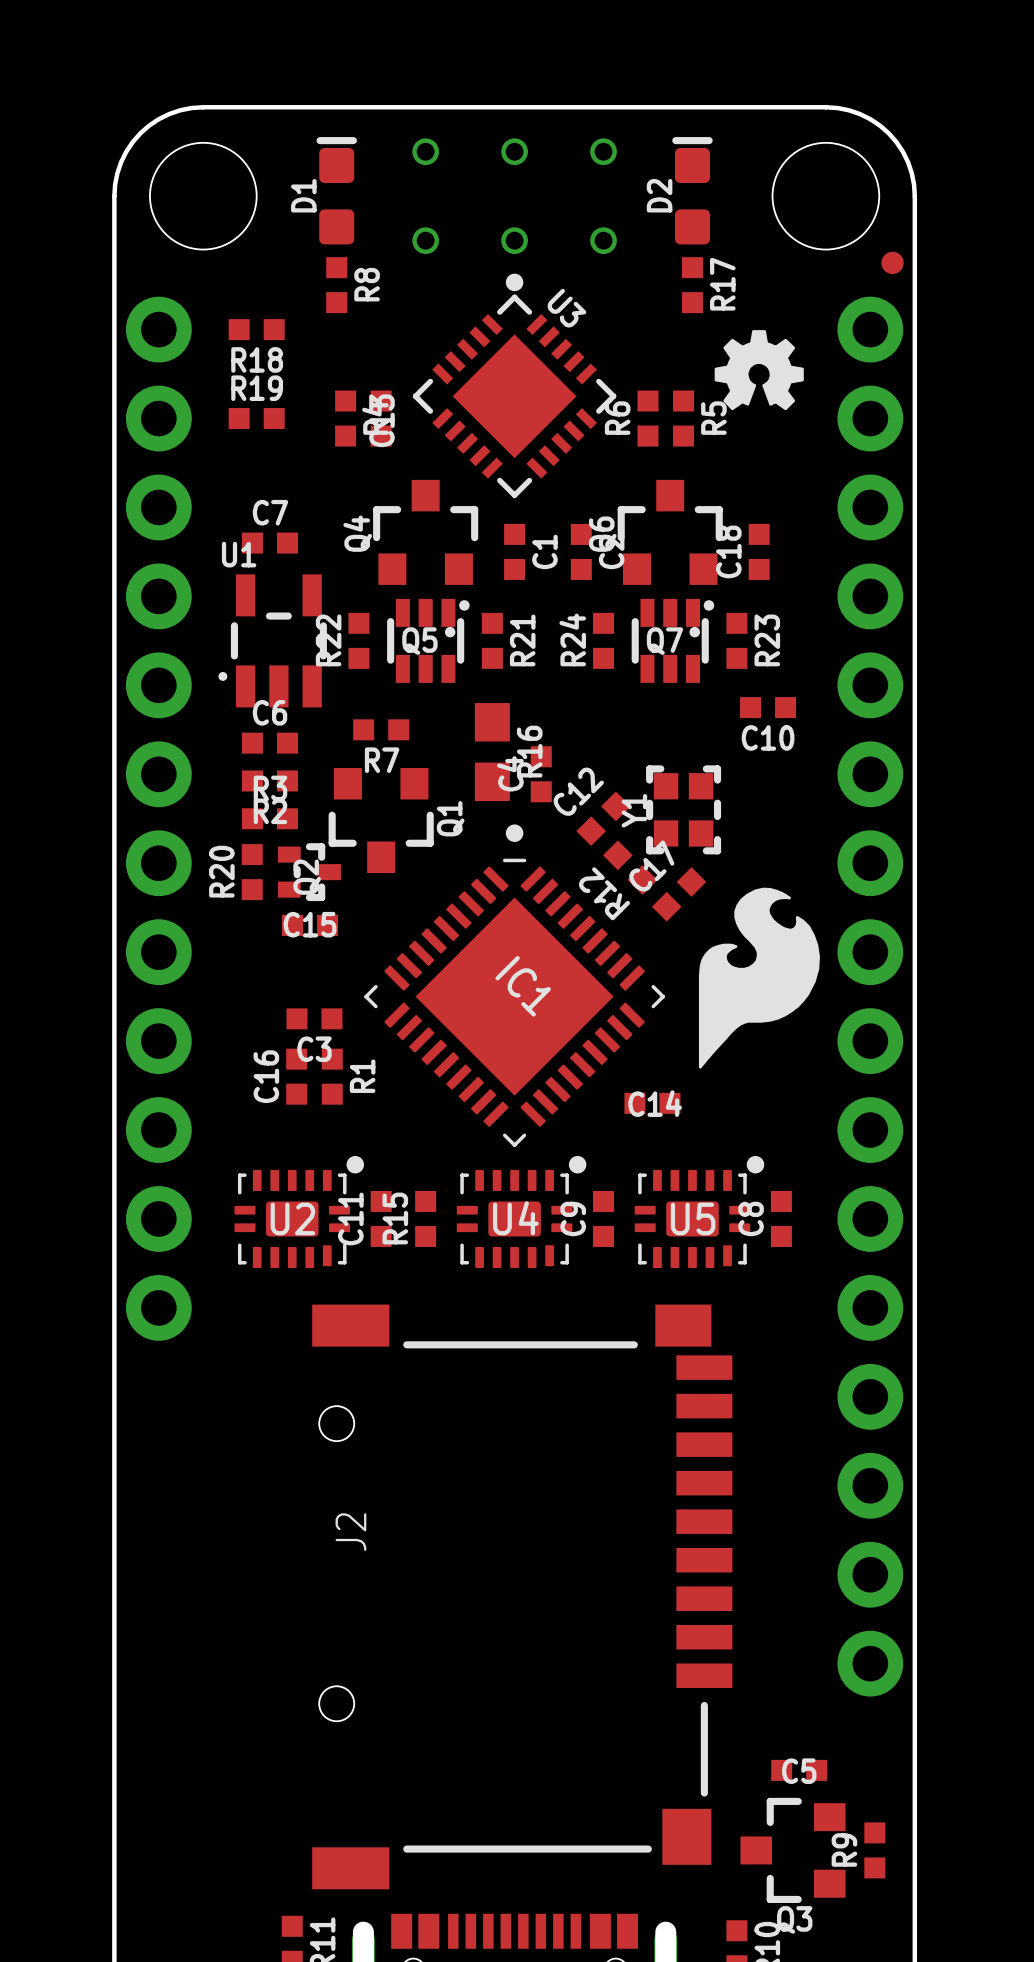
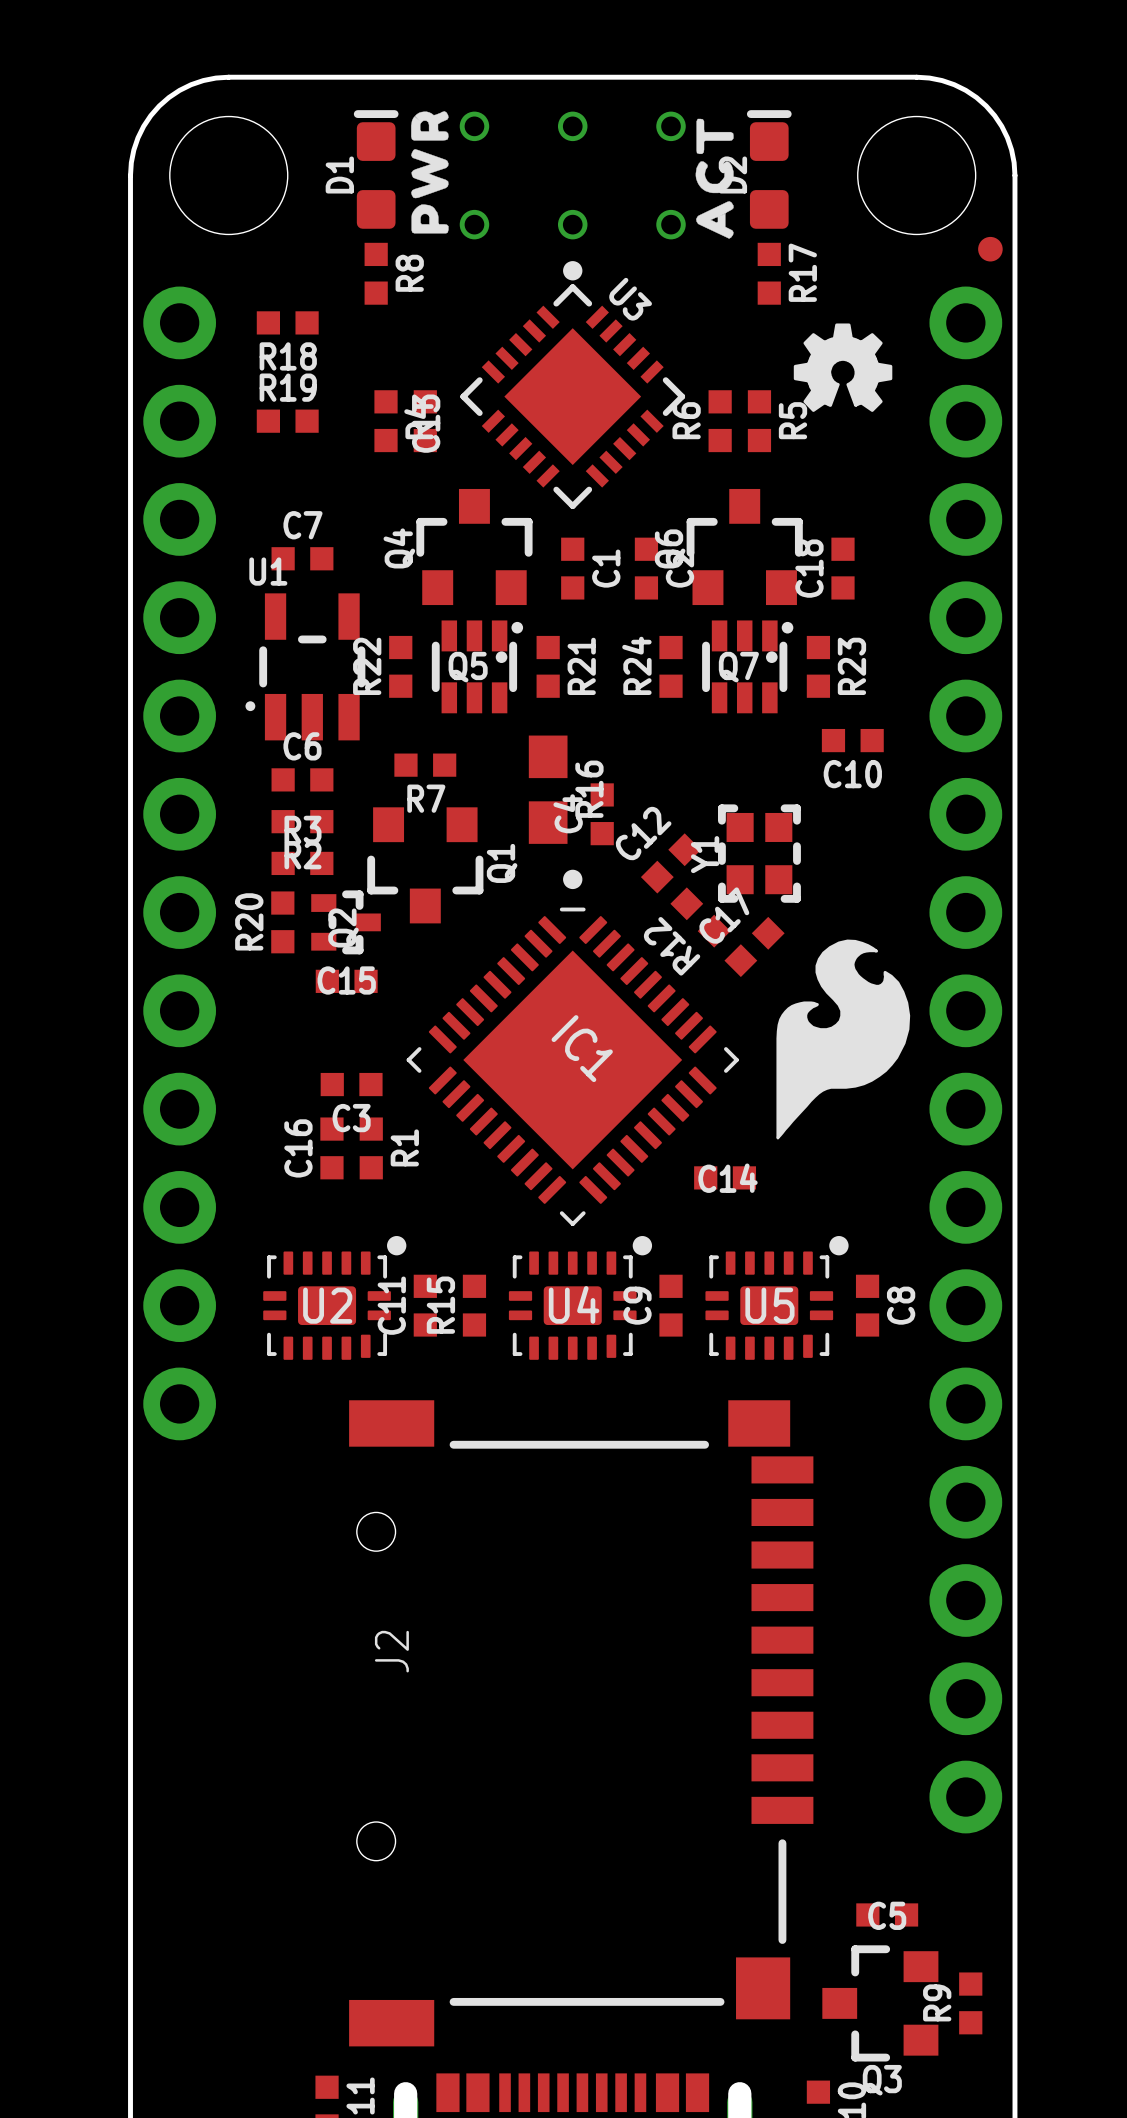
drawing: none -> [411, 111, 449, 234]
drawing: none -> [695, 118, 734, 239]
C8 name position: C8 (751, 1218) -> C8 (901, 1305)

